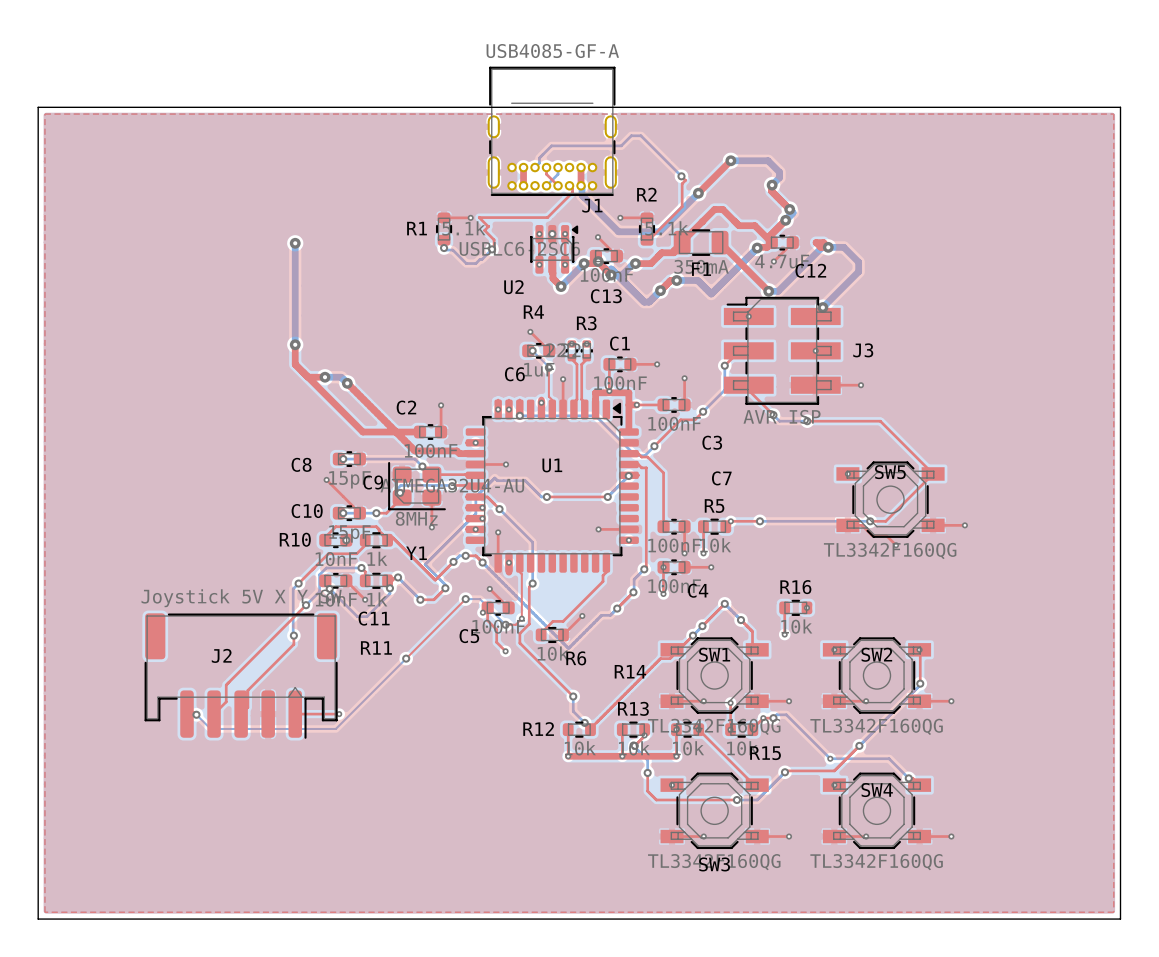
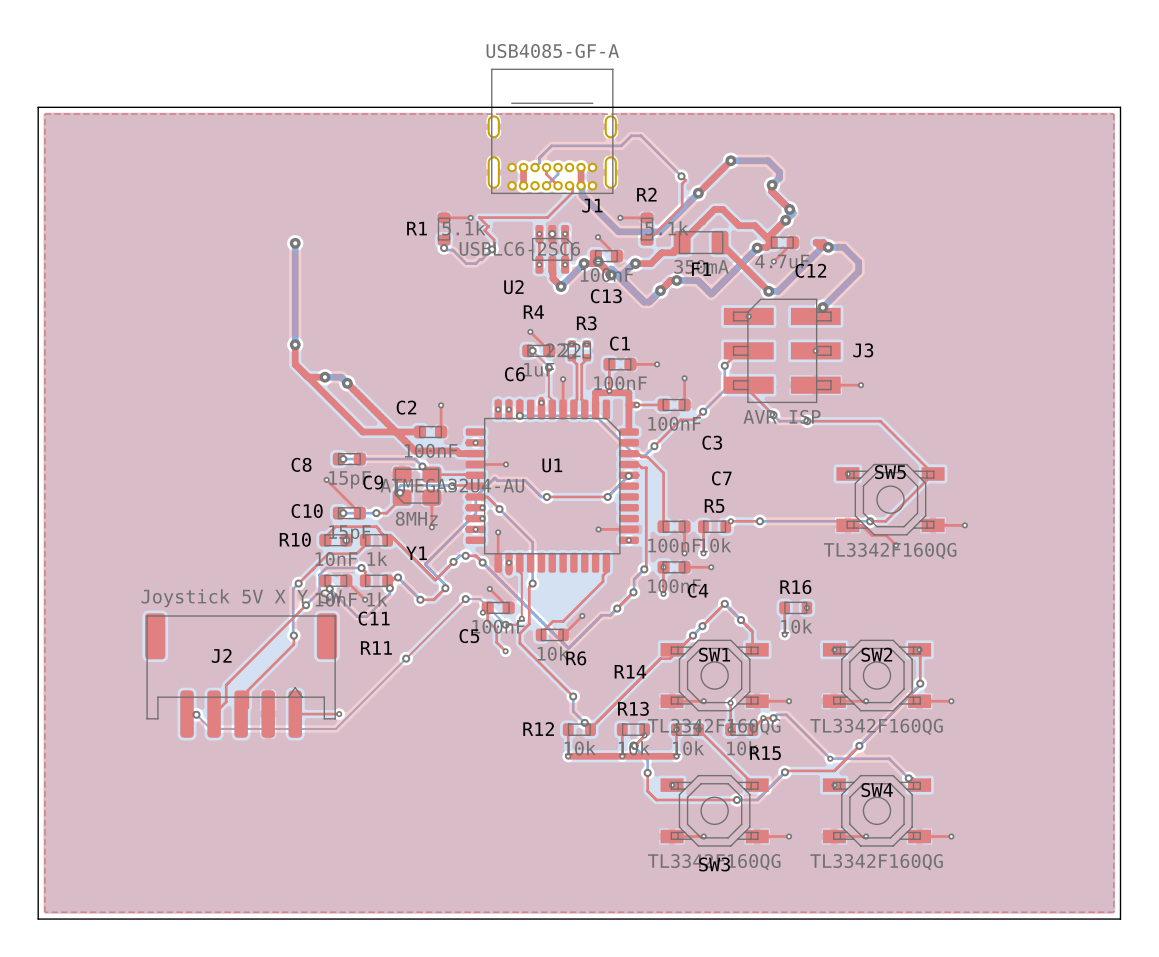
J1 footprint: [487, 66, 617, 197] -> [487, 68, 617, 195]
R1 footprint: [435, 212, 453, 246] -> [437, 212, 451, 246]
R2 footprint: [638, 212, 656, 246] -> [640, 212, 654, 246]
U2 footprint: [530, 225, 579, 274] -> [531, 225, 573, 274]
F1 footprint: [673, 229, 729, 256] -> [673, 230, 729, 255]
C12 footprint: [765, 234, 799, 251] -> [765, 236, 799, 250]
C13 footprint: [589, 248, 623, 265] -> [589, 249, 623, 263]
J3 footprint: [723, 296, 841, 405] -> [723, 298, 841, 404]
R4 footprint: [565, 340, 579, 362] -> [567, 340, 577, 362]
R3 footprint: [580, 340, 593, 362] -> [582, 340, 592, 362]
C6 footprint: [522, 342, 556, 359] -> [522, 344, 556, 358]
C1 footprint: [603, 356, 637, 373] -> [603, 357, 637, 371]
C3 footprint: [657, 397, 691, 413] -> [657, 398, 691, 412]
U1 footprint: [465, 399, 639, 573] -> [465, 399, 639, 573]
C2 footprint: [413, 424, 448, 440] -> [413, 425, 448, 439]
C9 footprint: [332, 451, 366, 467] -> [332, 452, 366, 466]
Y1 footprint: [388, 461, 446, 511] -> [392, 466, 442, 506]
SW5 footprint: [836, 461, 945, 538] -> [836, 463, 945, 536]
C8 footprint: [332, 505, 366, 522] -> [332, 506, 366, 520]
C7 footprint: [657, 518, 691, 535] -> [657, 520, 691, 534]
R5 footprint: [698, 518, 732, 535] -> [698, 520, 732, 534]
C10 footprint: [319, 532, 353, 549] -> [319, 533, 353, 547]
R10 footprint: [359, 532, 393, 549] -> [359, 533, 393, 547]
C4 footprint: [657, 559, 691, 576] -> [657, 560, 691, 574]
C11 footprint: [319, 572, 353, 589] -> [319, 574, 353, 588]
R11 footprint: [359, 572, 393, 589] -> [359, 574, 393, 588]
C5 footprint: [481, 599, 515, 616] -> [481, 601, 515, 615]
R16 footprint: [779, 599, 813, 616] -> [779, 601, 813, 615]
J2 footprint: [144, 613, 338, 739] -> [145, 613, 338, 738]
R6 footprint: [535, 626, 569, 644] -> [535, 628, 569, 642]
SW1 footprint: [660, 637, 769, 714] -> [660, 639, 769, 712]
SW2 footprint: [822, 637, 932, 714] -> [822, 639, 932, 712]
R12 footprint: [562, 721, 596, 738] -> [562, 723, 596, 737]
R13 footprint: [616, 721, 651, 738] -> [616, 723, 651, 737]
R14 footprint: [671, 721, 705, 738] -> [671, 723, 705, 737]
R15 footprint: [725, 721, 759, 738] -> [725, 723, 759, 737]
SW3 footprint: [660, 772, 769, 850] -> [660, 774, 769, 847]
SW4 footprint: [822, 772, 932, 850] -> [822, 774, 932, 847]

